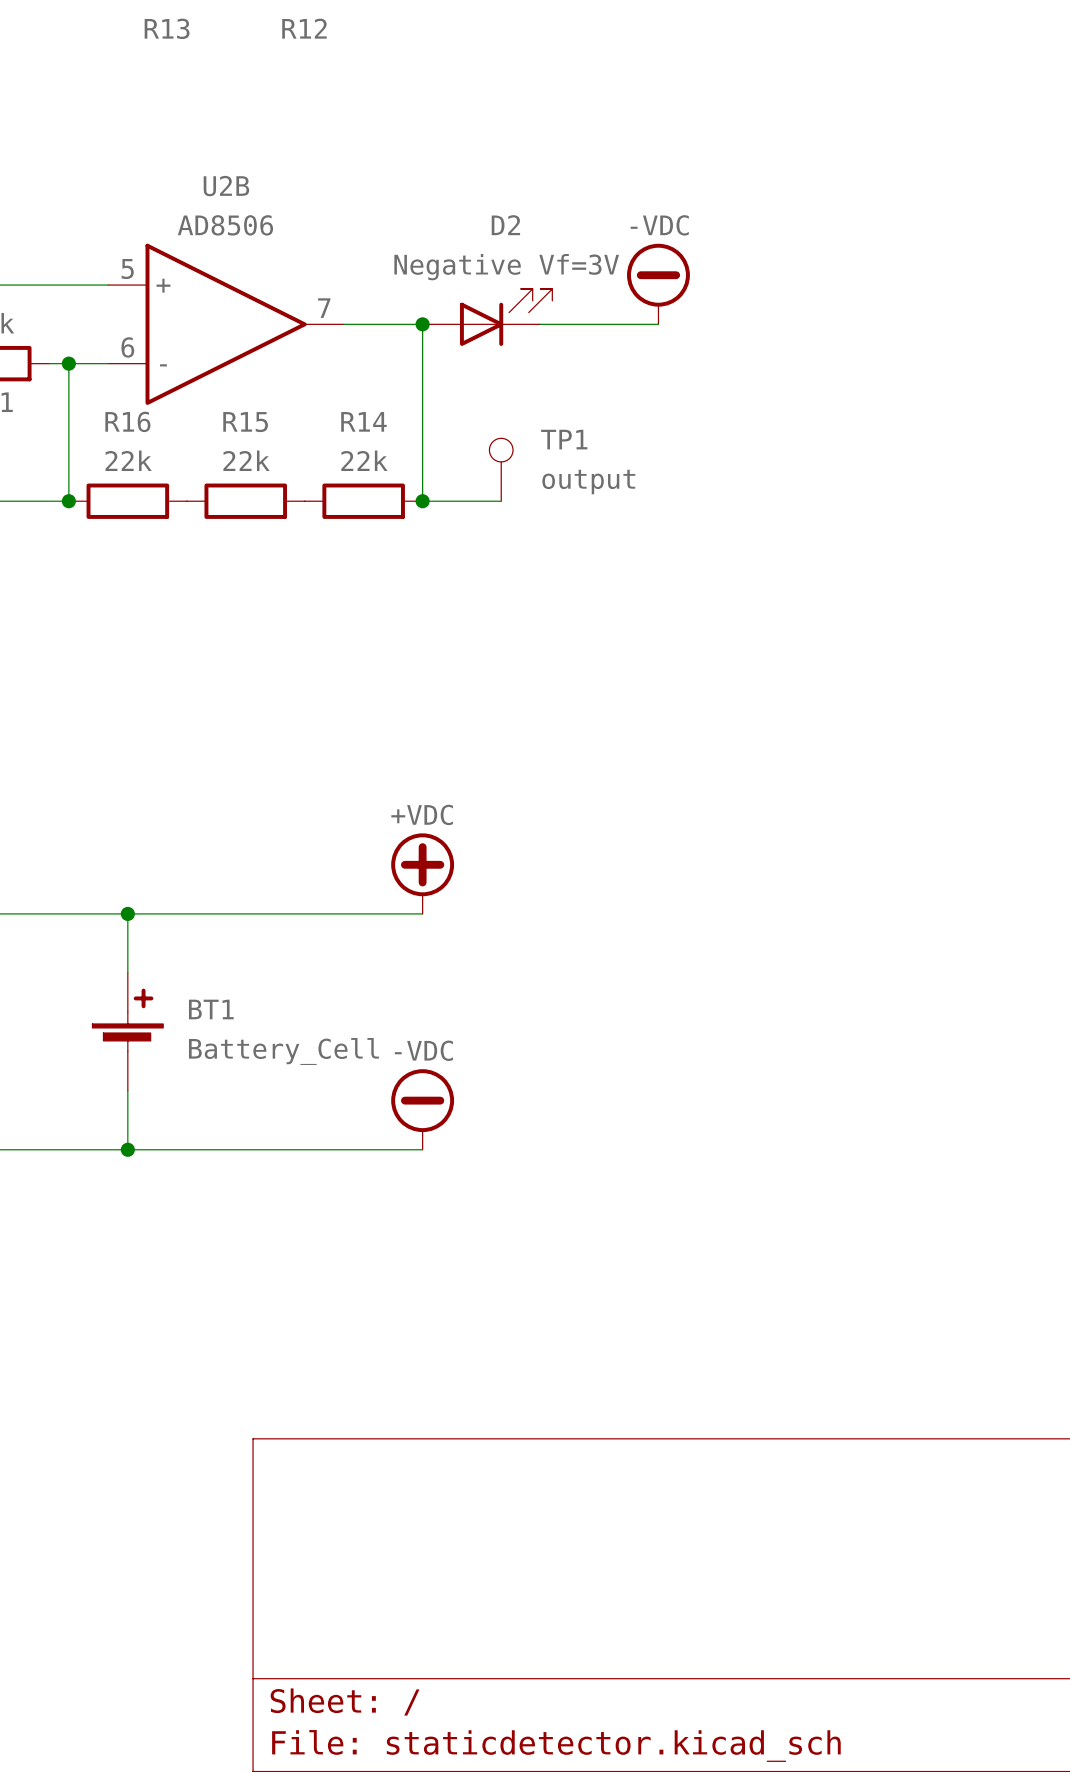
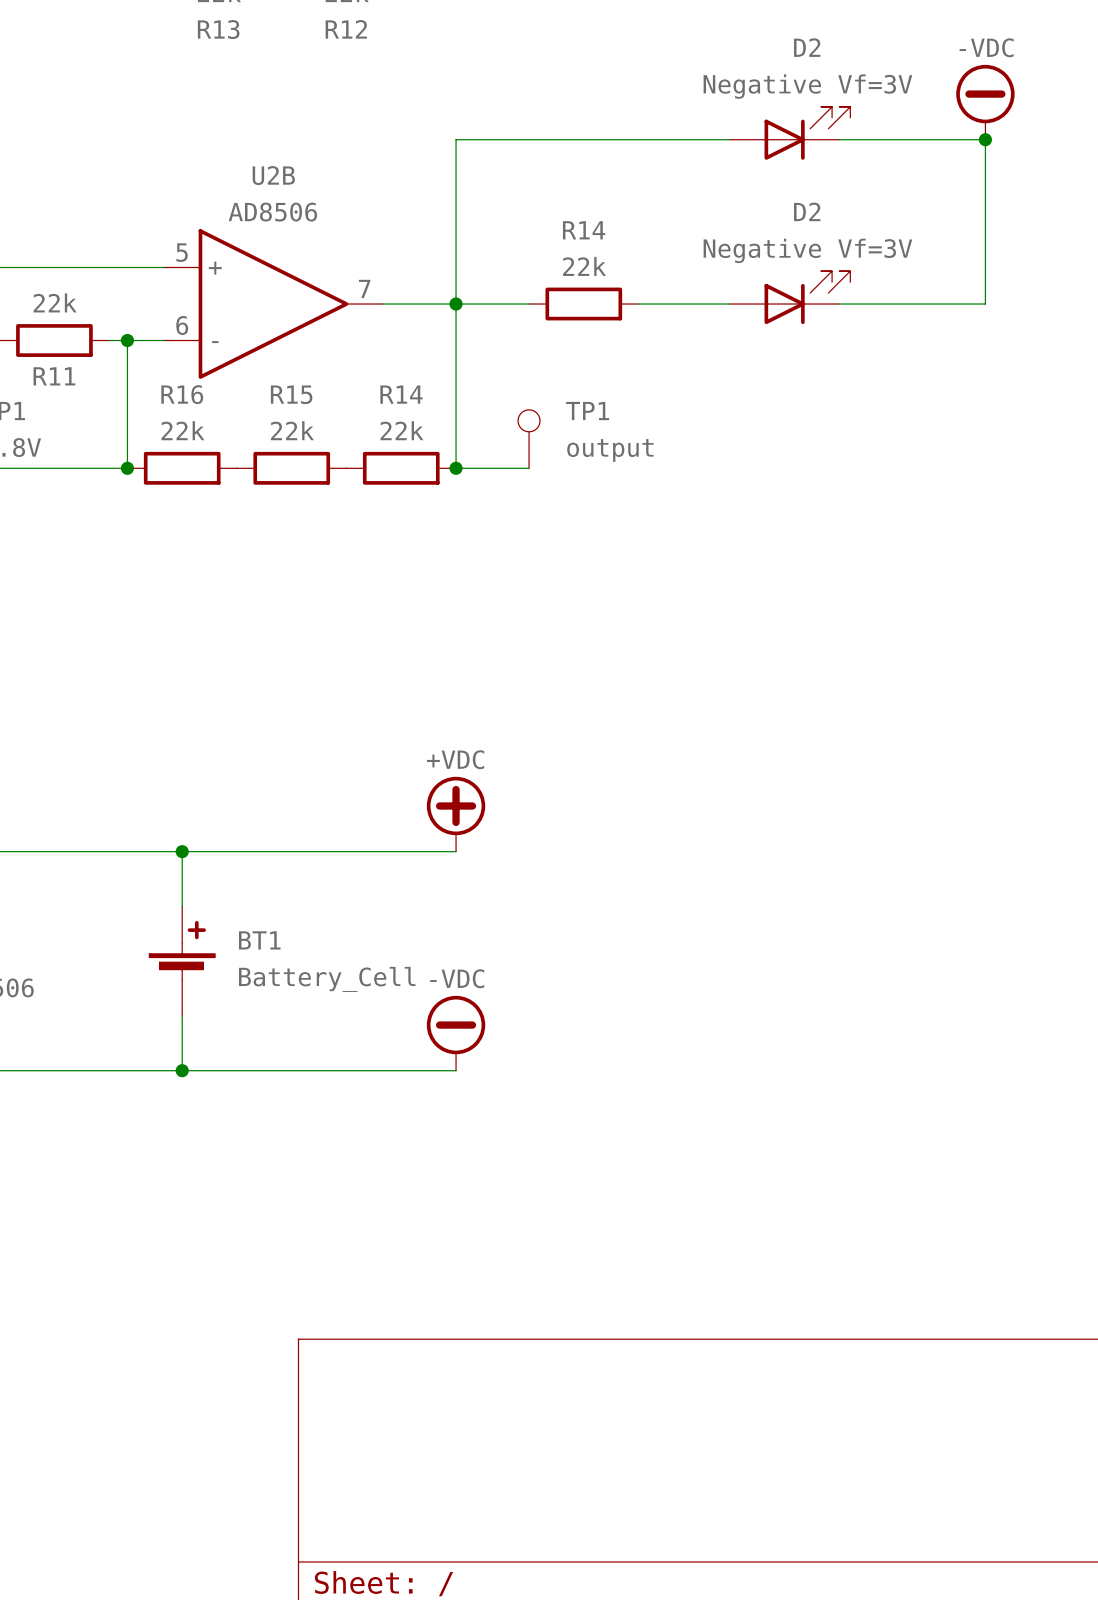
D2: none -> Negative Vf=3V (790, 133)
wire: none -> (729, 139) (456, 139) (456, 304) (529, 304)
wire: none -> (839, 139) (985, 139) (985, 304) (839, 304)
junction: none -> (985, 139)
power symbol position: -VDC (658, 284) -> -VDC (985, 102)
D2: Negative Vf=3V (487, 317) -> none
D2: none -> Negative Vf=3V (790, 297)
wire: (540, 324) (619, 324) -> none
R14: none -> 22k (583, 304)
wire: none -> (675, 304) (729, 304)

